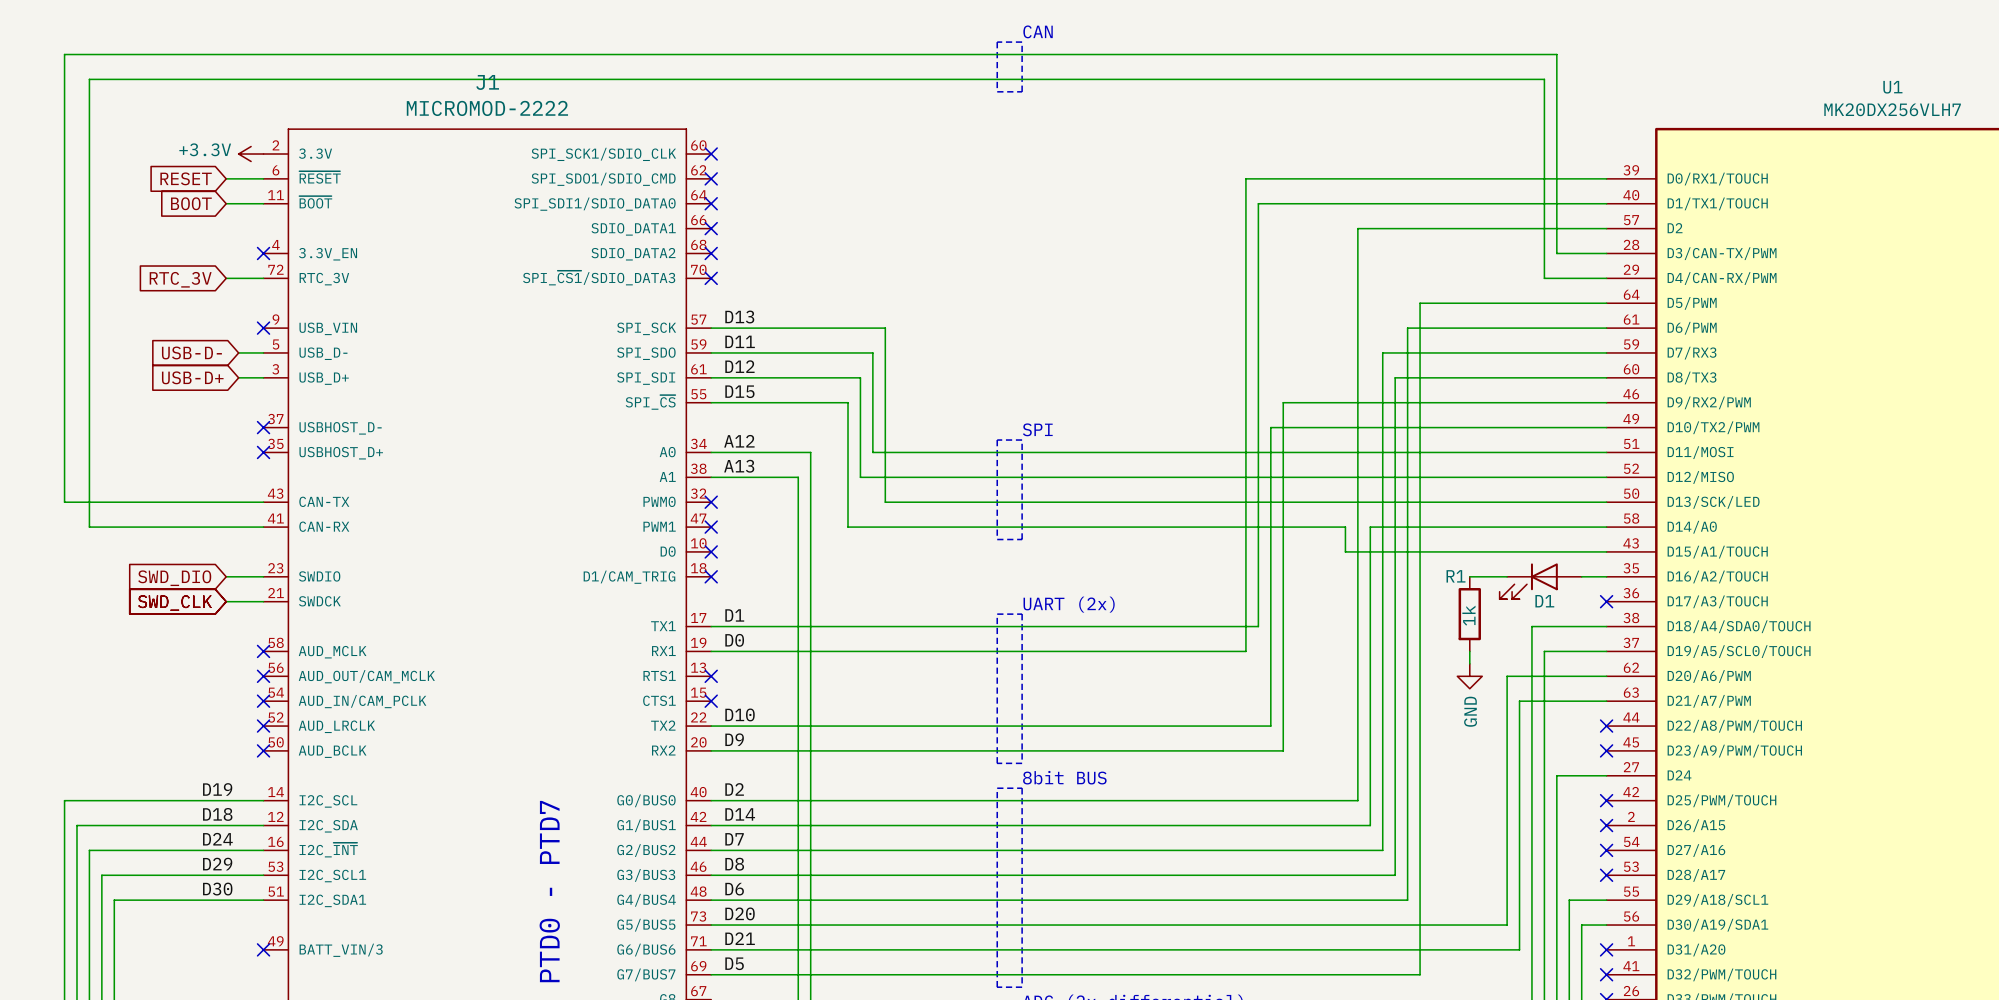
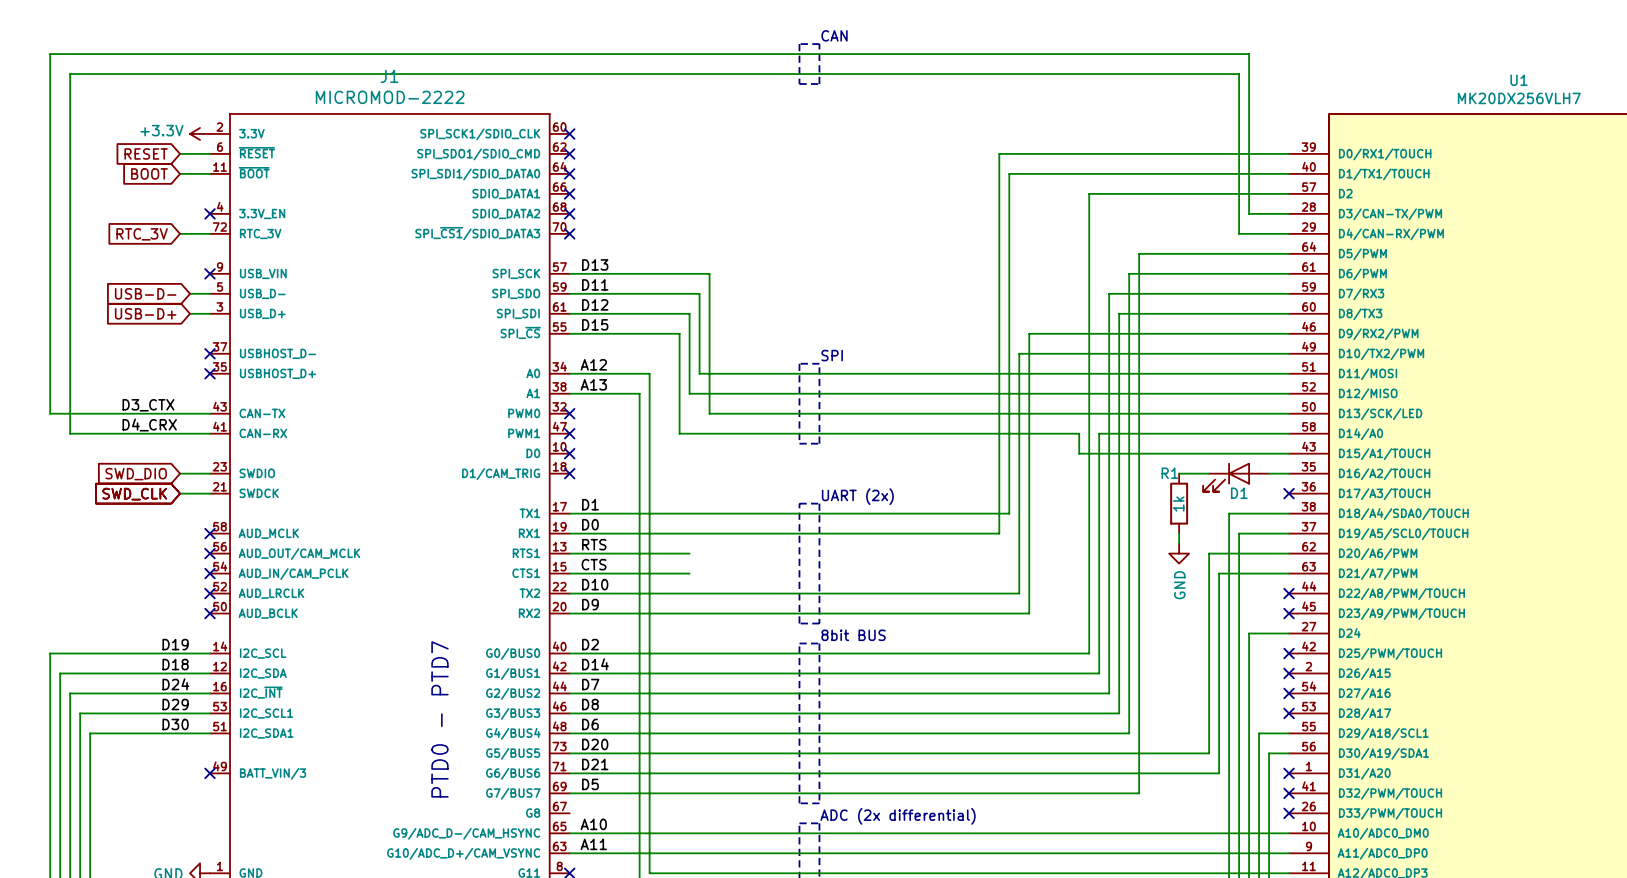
label: none -> D3_CTX (148, 405)
label: none -> D4_CRX (149, 425)
label: none -> RTS (594, 544)
wire: none -> (569, 553) (689, 553)
no-connect mark: (711, 676) -> none
label: none -> CTS (594, 564)
wire: none -> (569, 573) (689, 573)
no-connect mark: (711, 701) -> none

